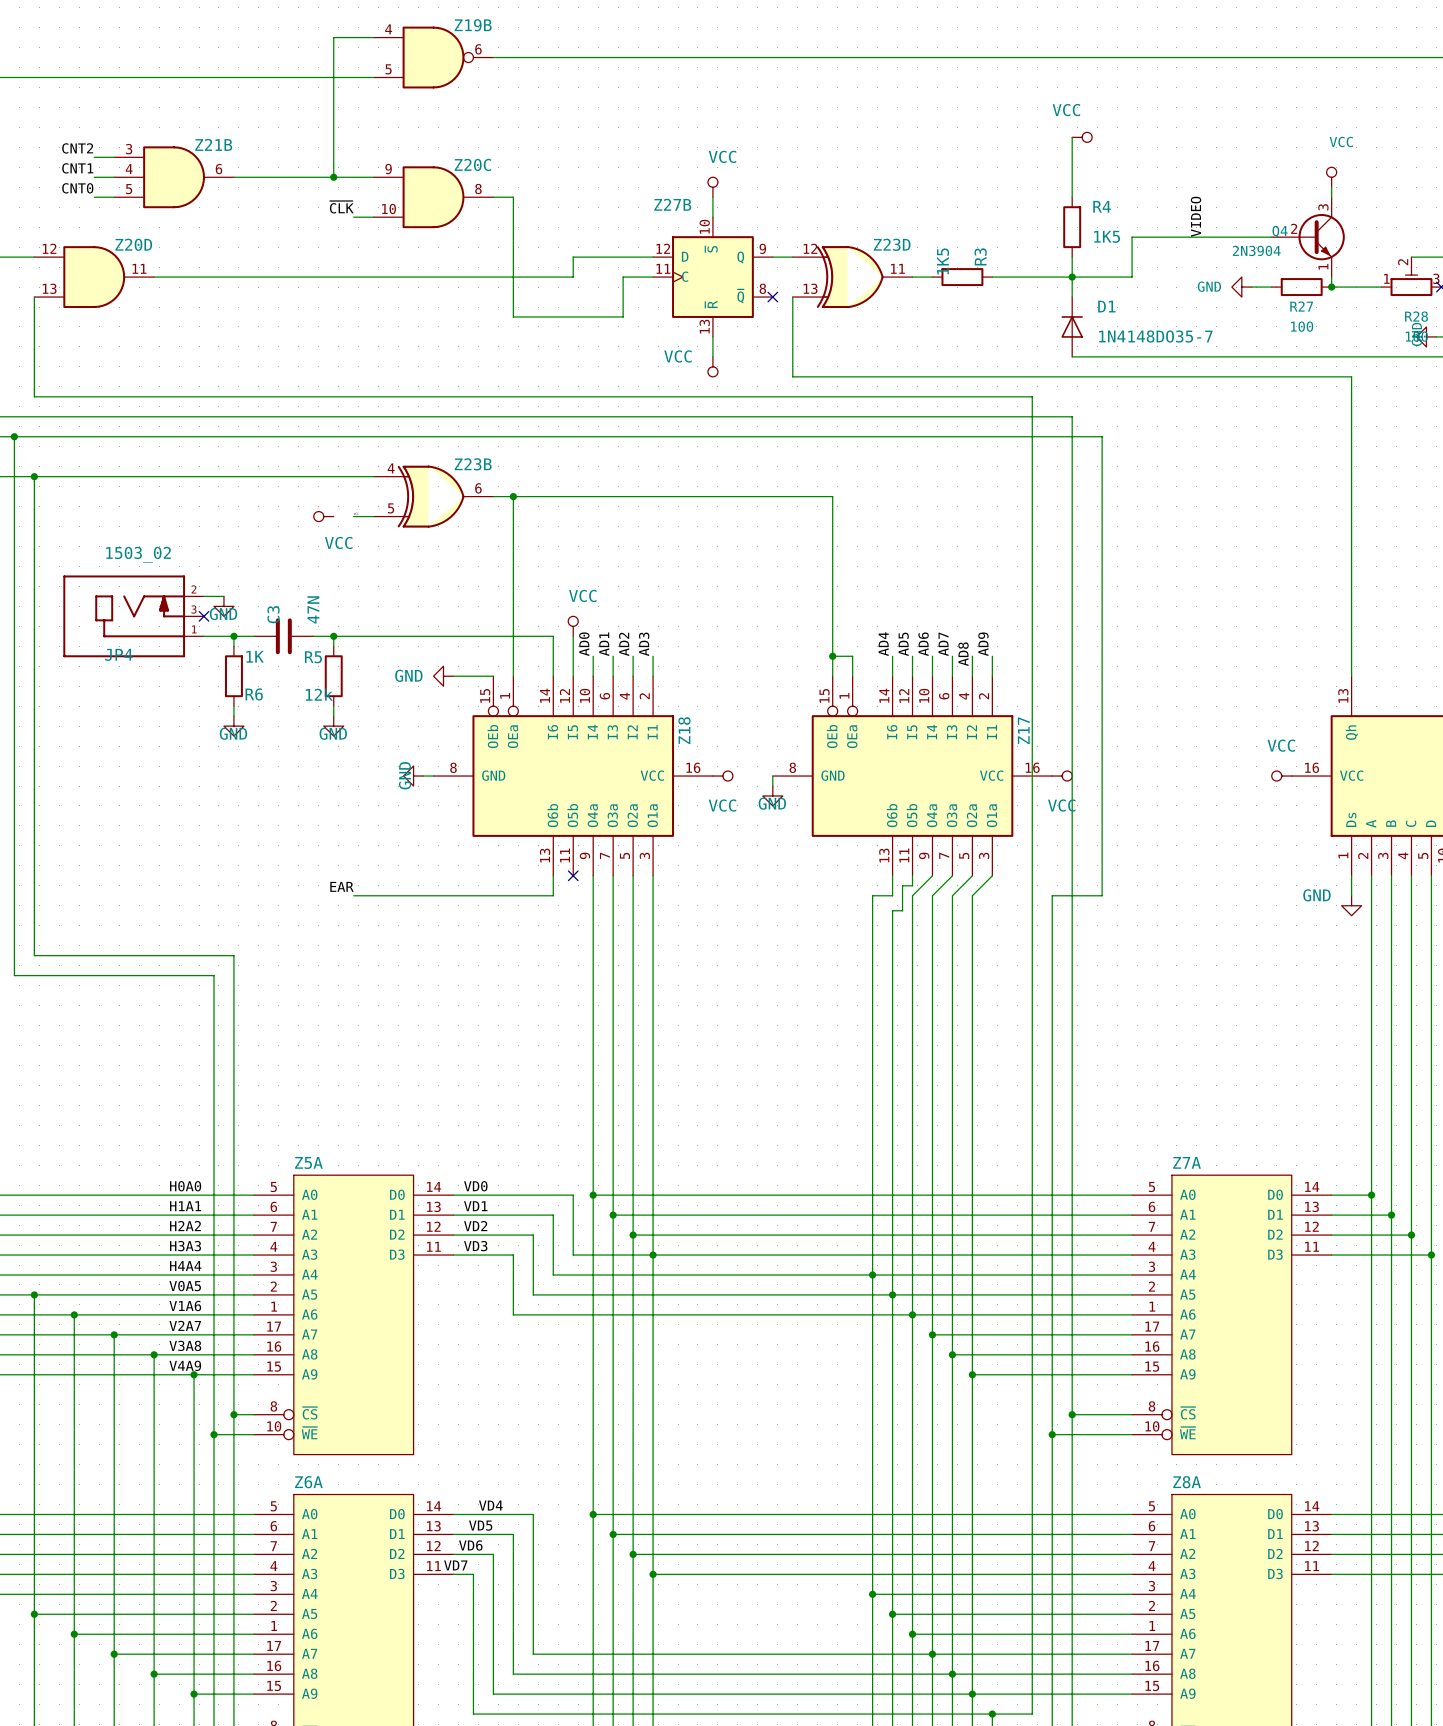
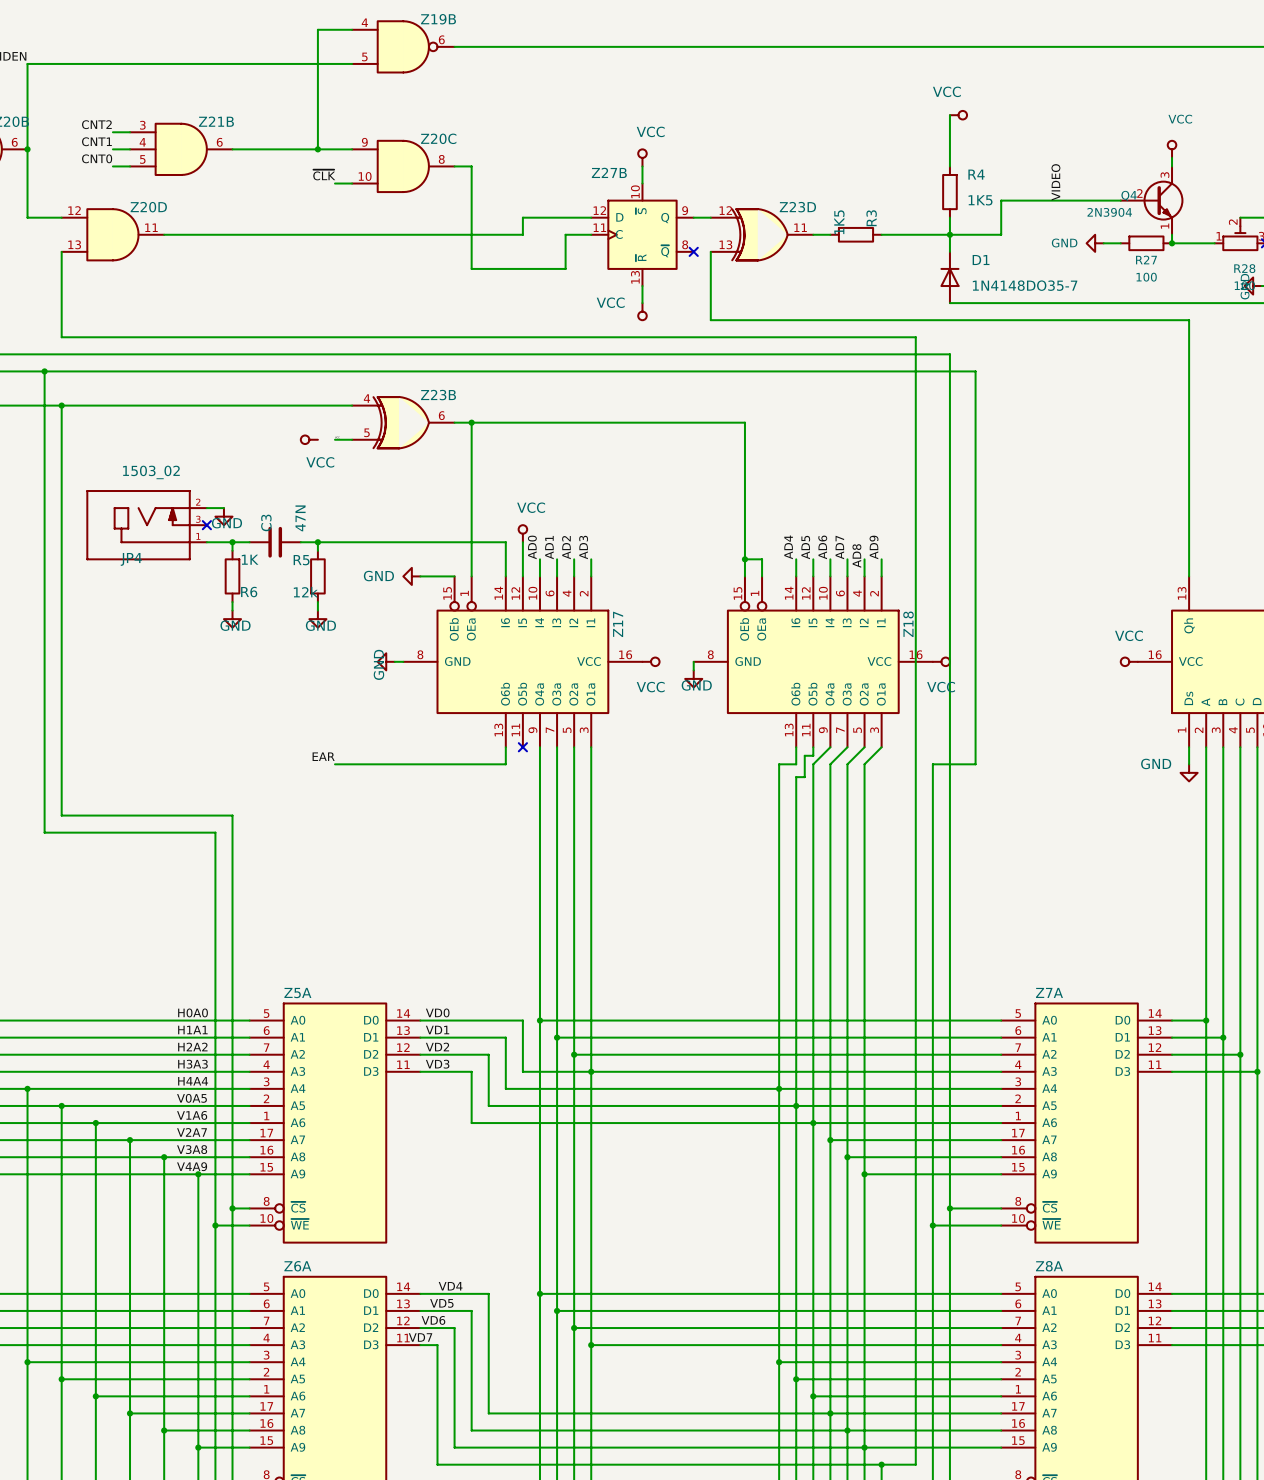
Z18 name: Z18 (684, 730) -> Z17 (618, 624)
Z17 name: Z17 (1023, 730) -> Z18 (908, 624)

